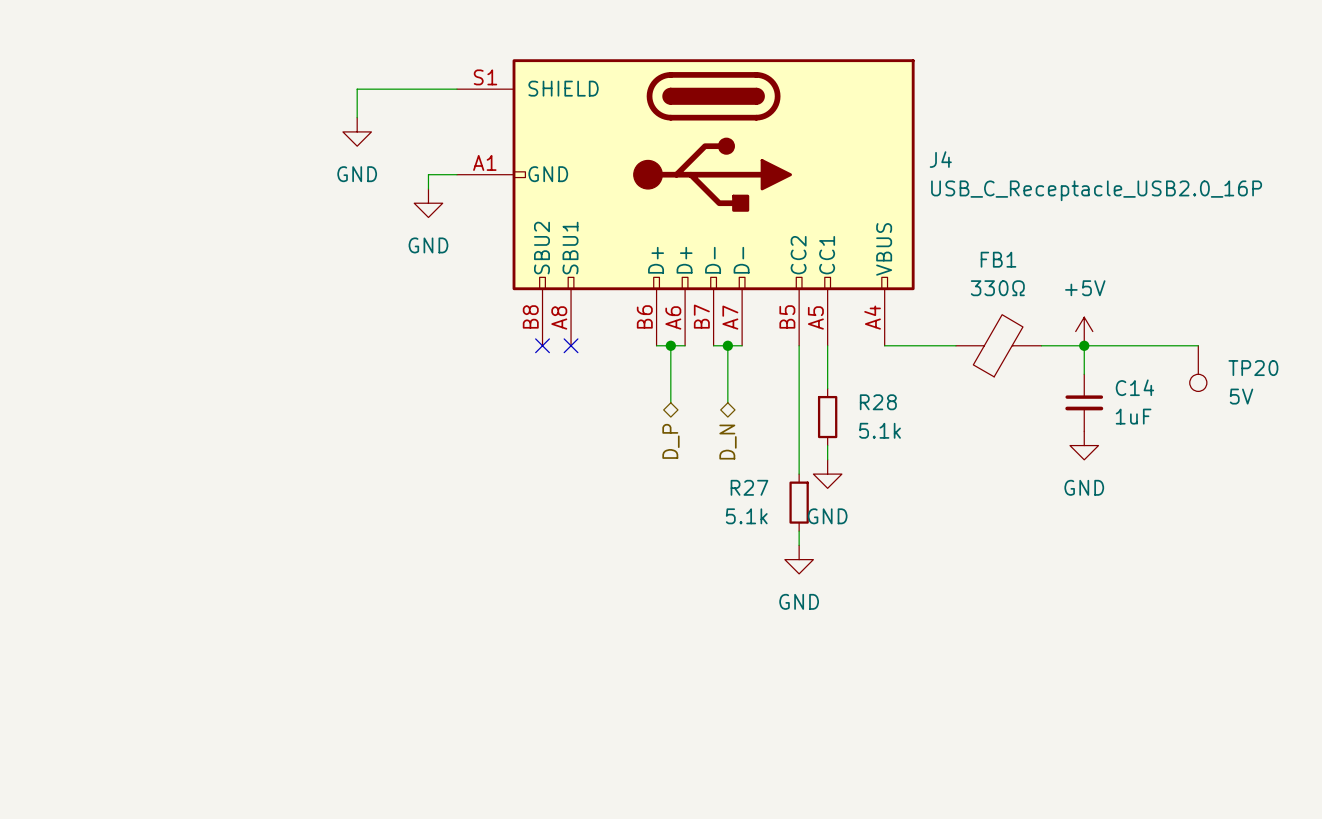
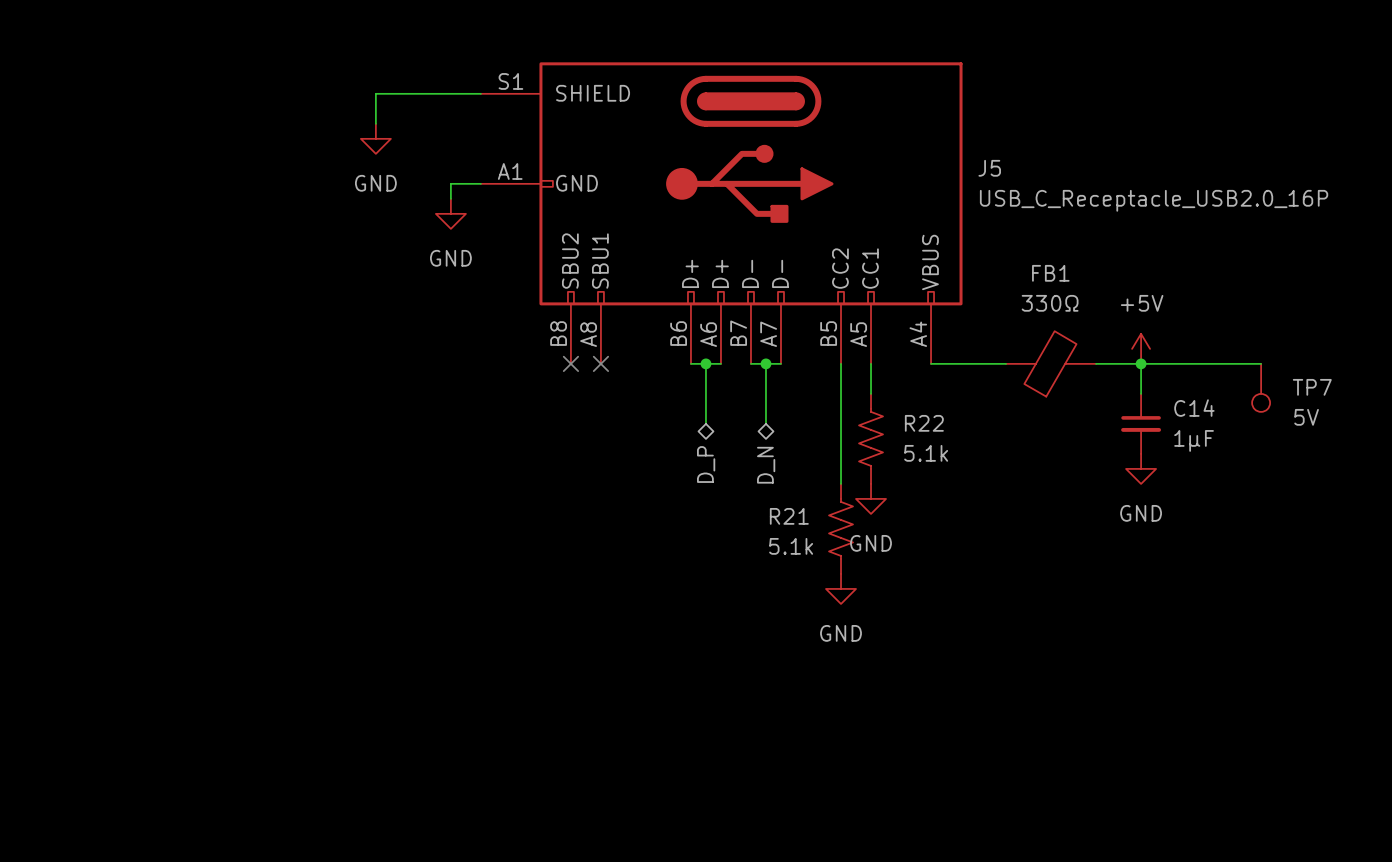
J4 name: J4 (940, 159) -> J5 (989, 168)
TP20 name: TP20 (1253, 368) -> TP7 (1312, 387)
C14 value: 1uF (1133, 416) -> 1µF (1194, 440)
R28: 5.1k (827, 417) -> none
R22: none -> 5.1k (871, 438)
R27: 5.1k (799, 502) -> none
R21: none -> 5.1k (841, 528)

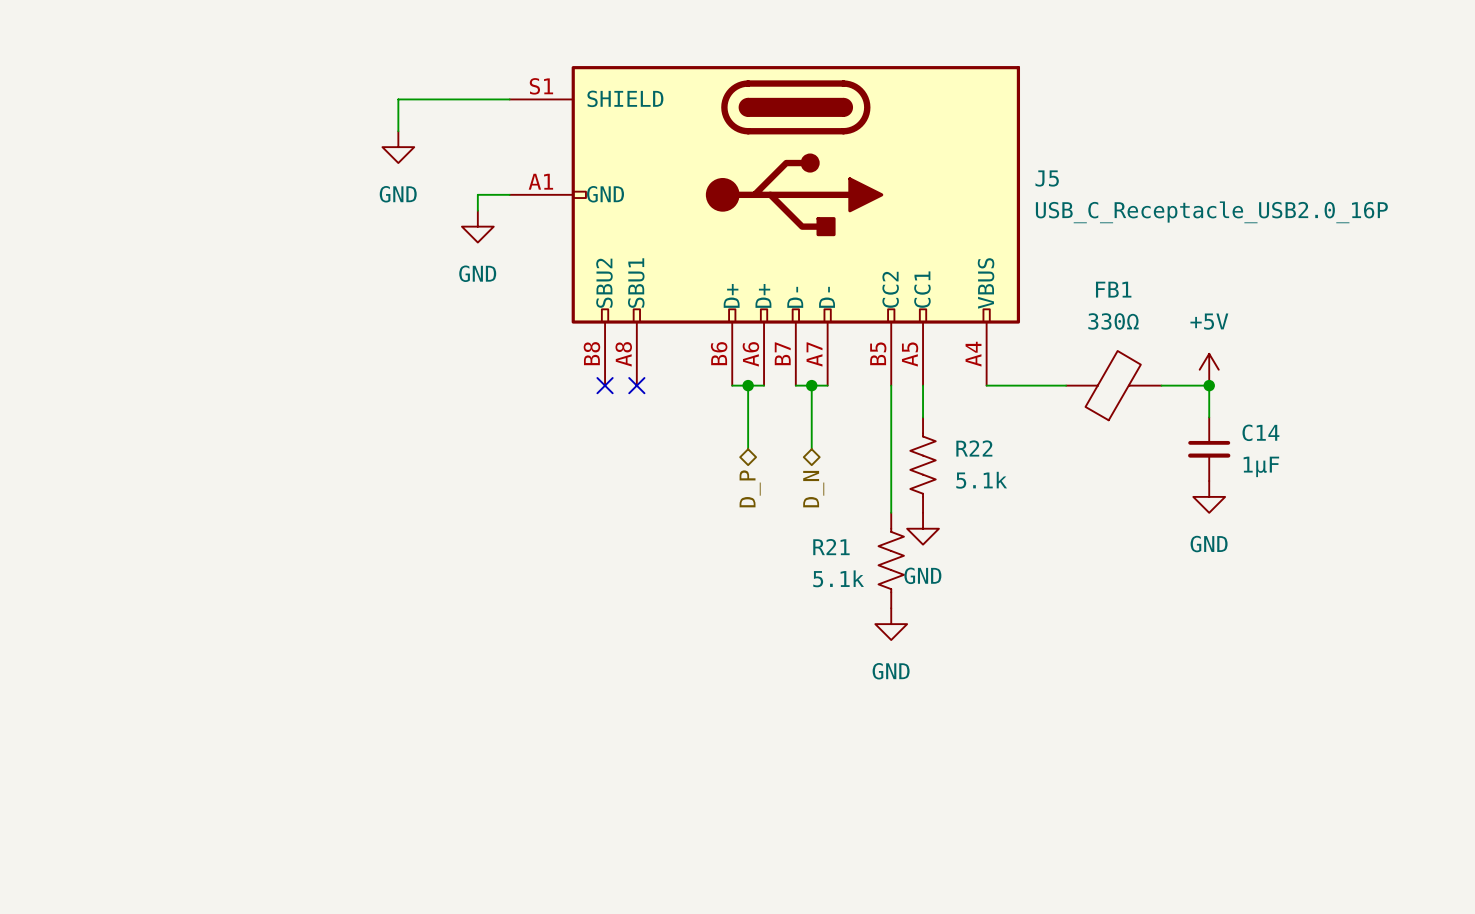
wire: (1141, 363) (1261, 363) -> none
TP7: 5V (1261, 387) -> none

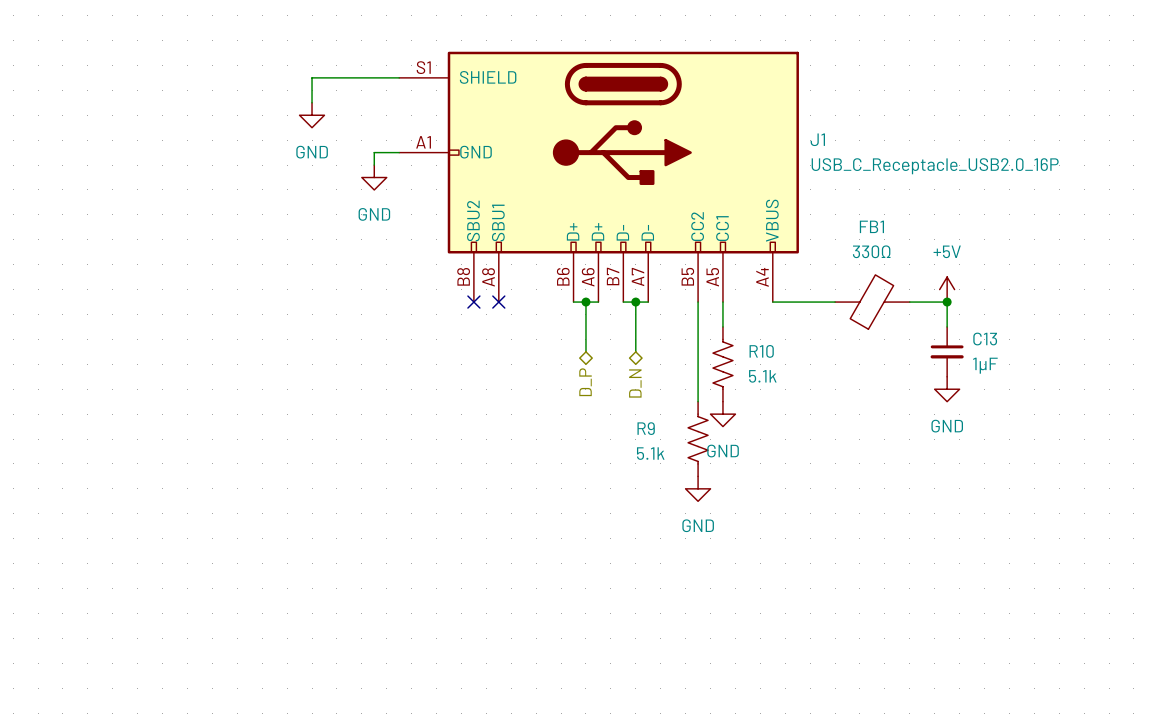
J5 name: J5 (1047, 178) -> J1 (817, 139)
C14 name: C14 (1260, 432) -> C13 (985, 339)
R22 name: R22 (974, 448) -> R10 (761, 351)
R21 name: R21 (831, 547) -> R9 (646, 428)

